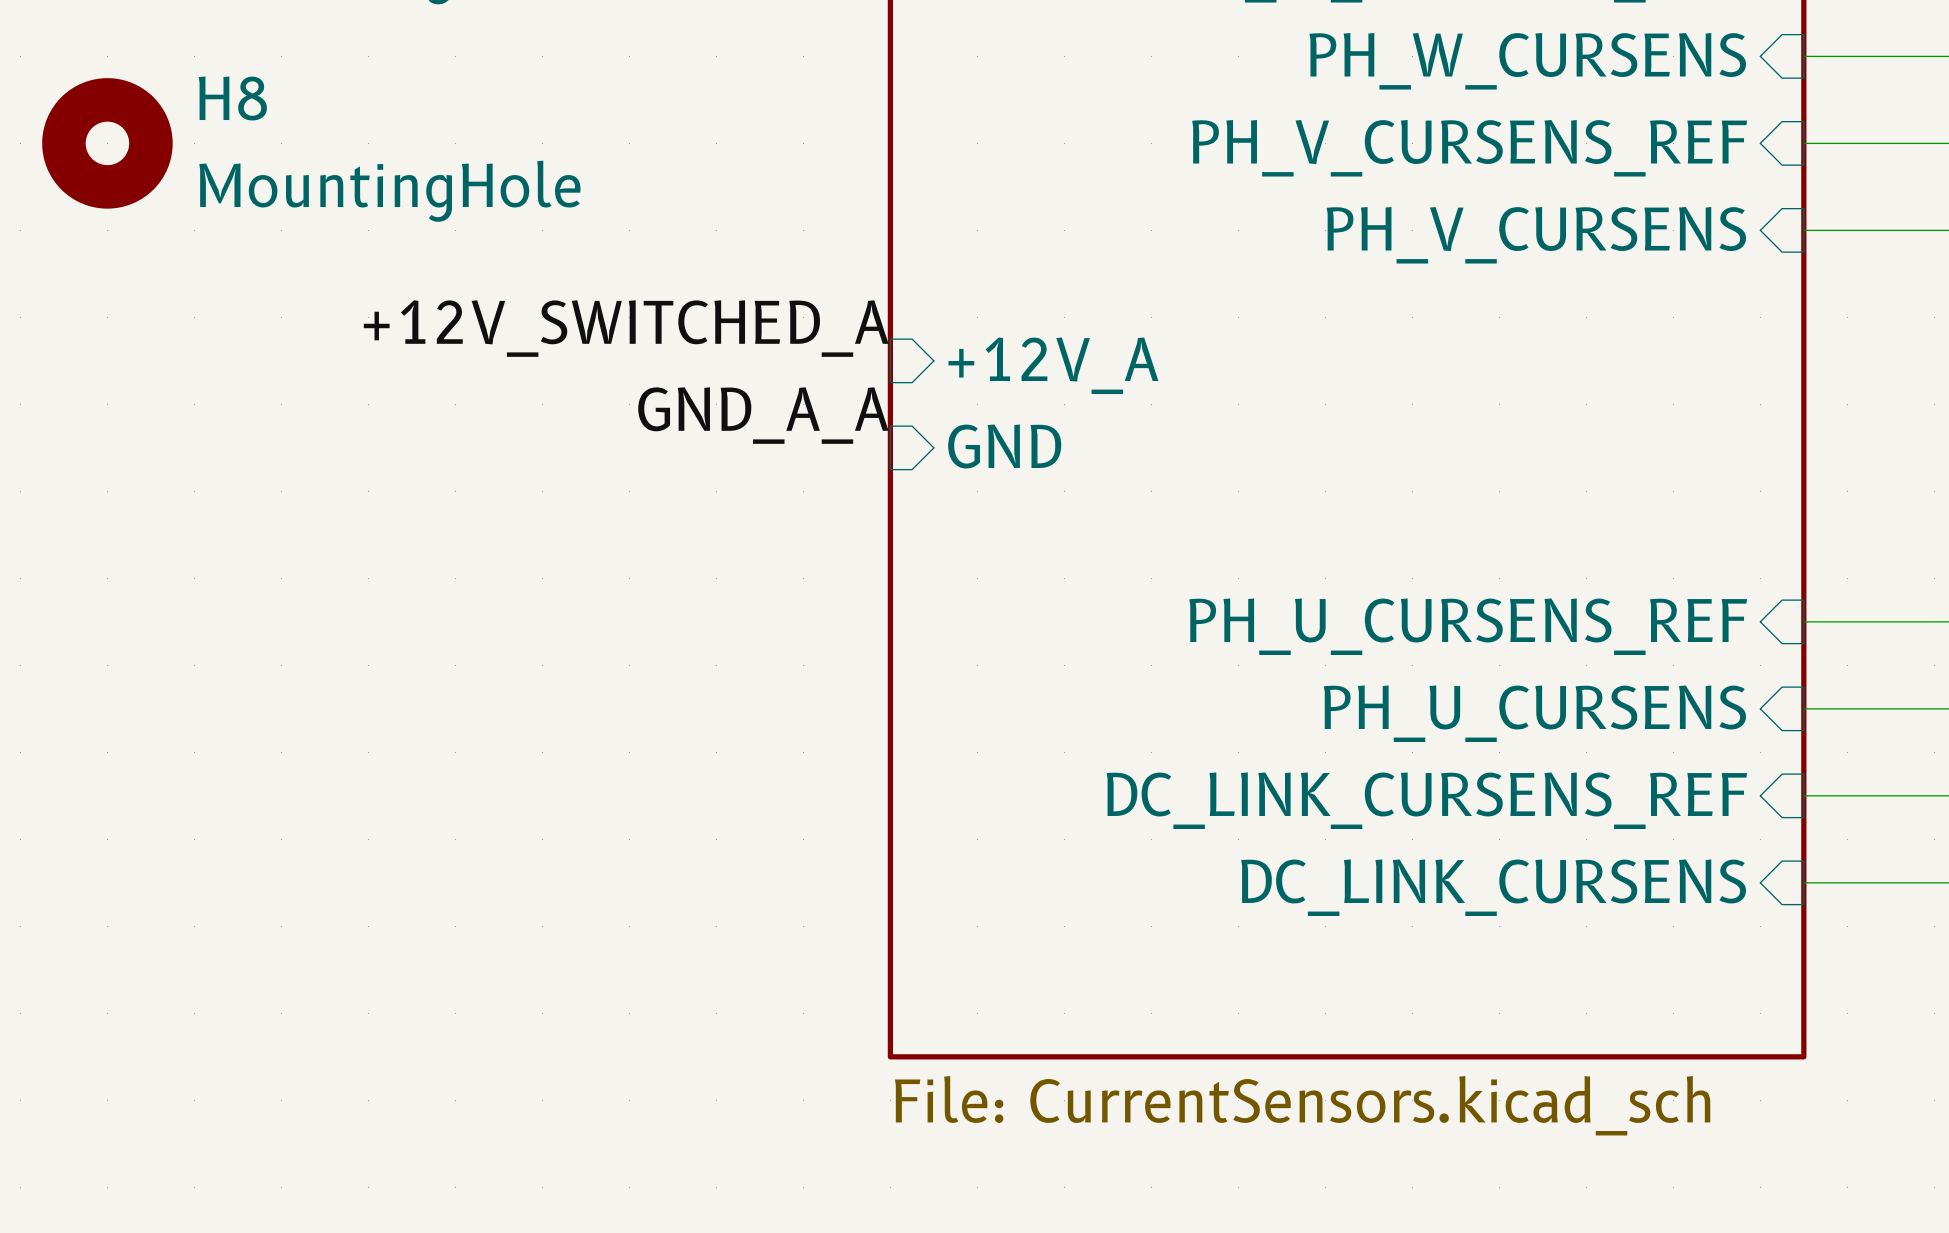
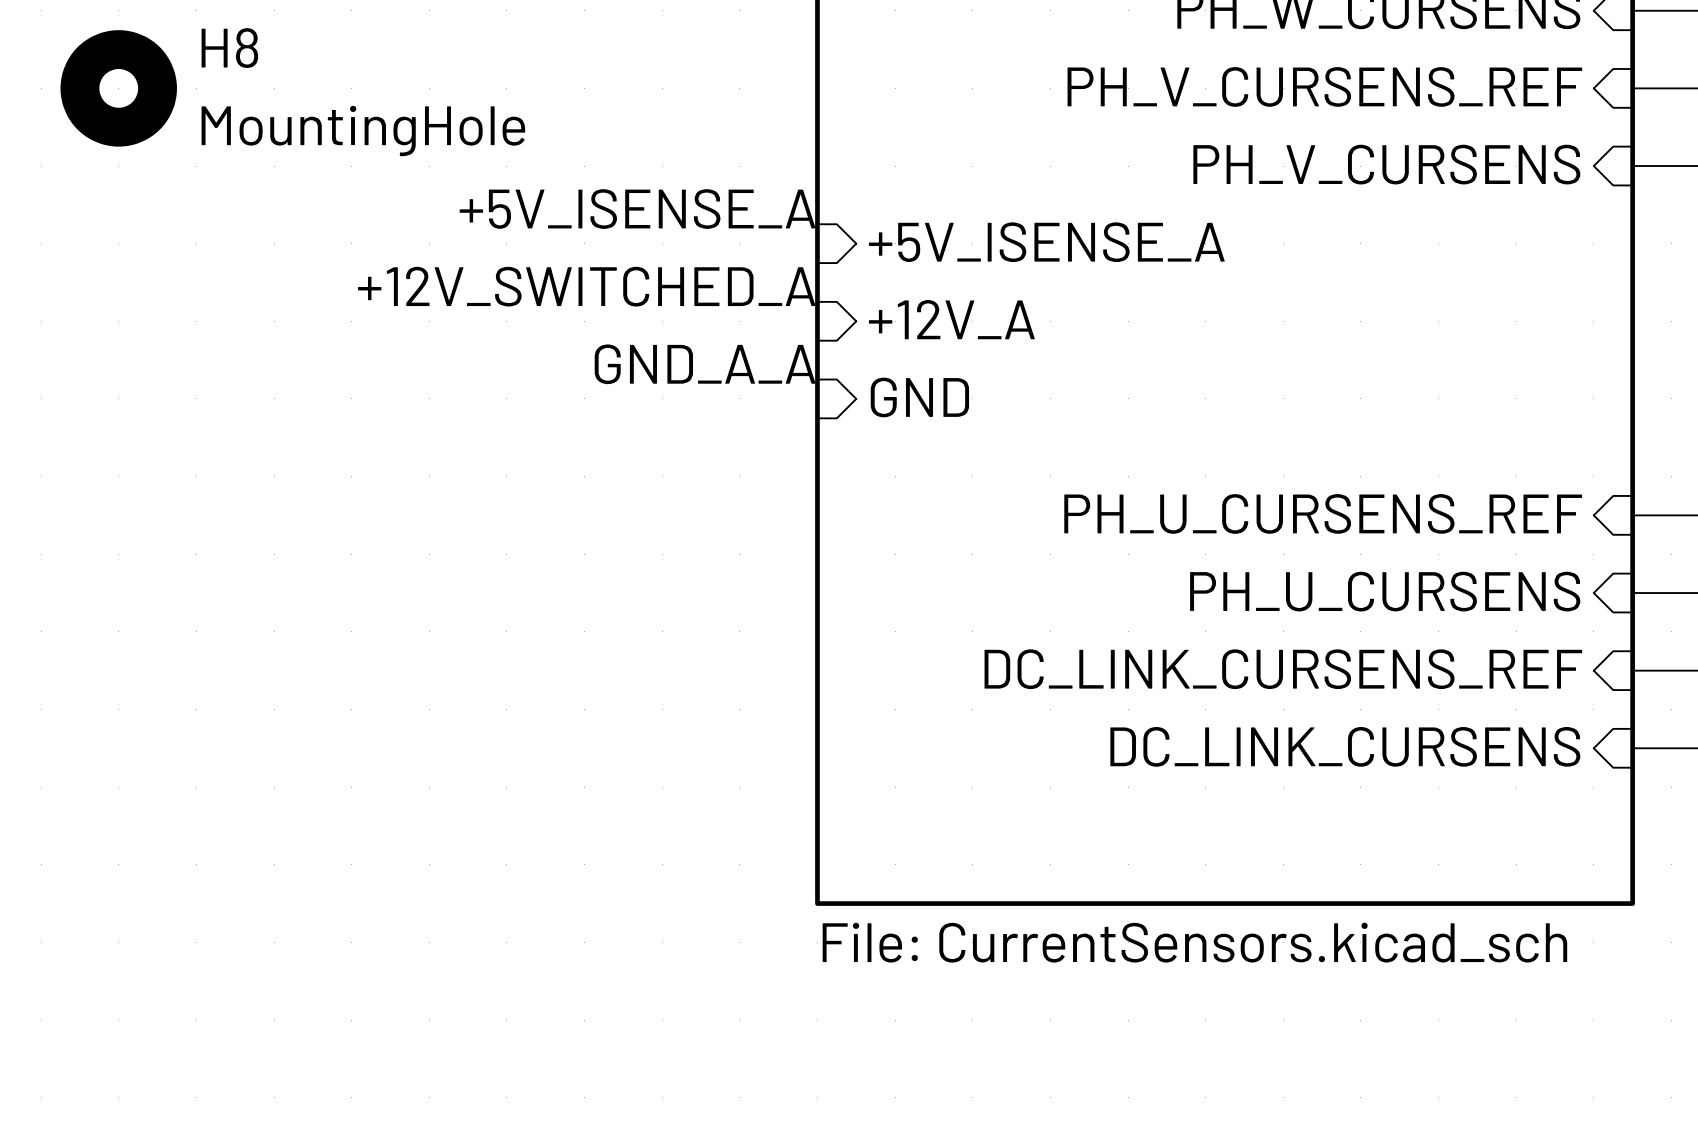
label: none -> +5V_ISENSE_A (637, 209)
sheet pin: none -> +5V_ISENSE_A (1046, 242)
label position: +12V_SWITCHED_A (626, 328) -> +12V_SWITCHED_A (586, 286)
sheet pin position: +12V_A (1053, 365) -> +12V_A (951, 319)
label position: GND_A_A (763, 415) -> GND_A_A (705, 364)
sheet pin position: GND (1004, 446) -> GND (919, 397)

